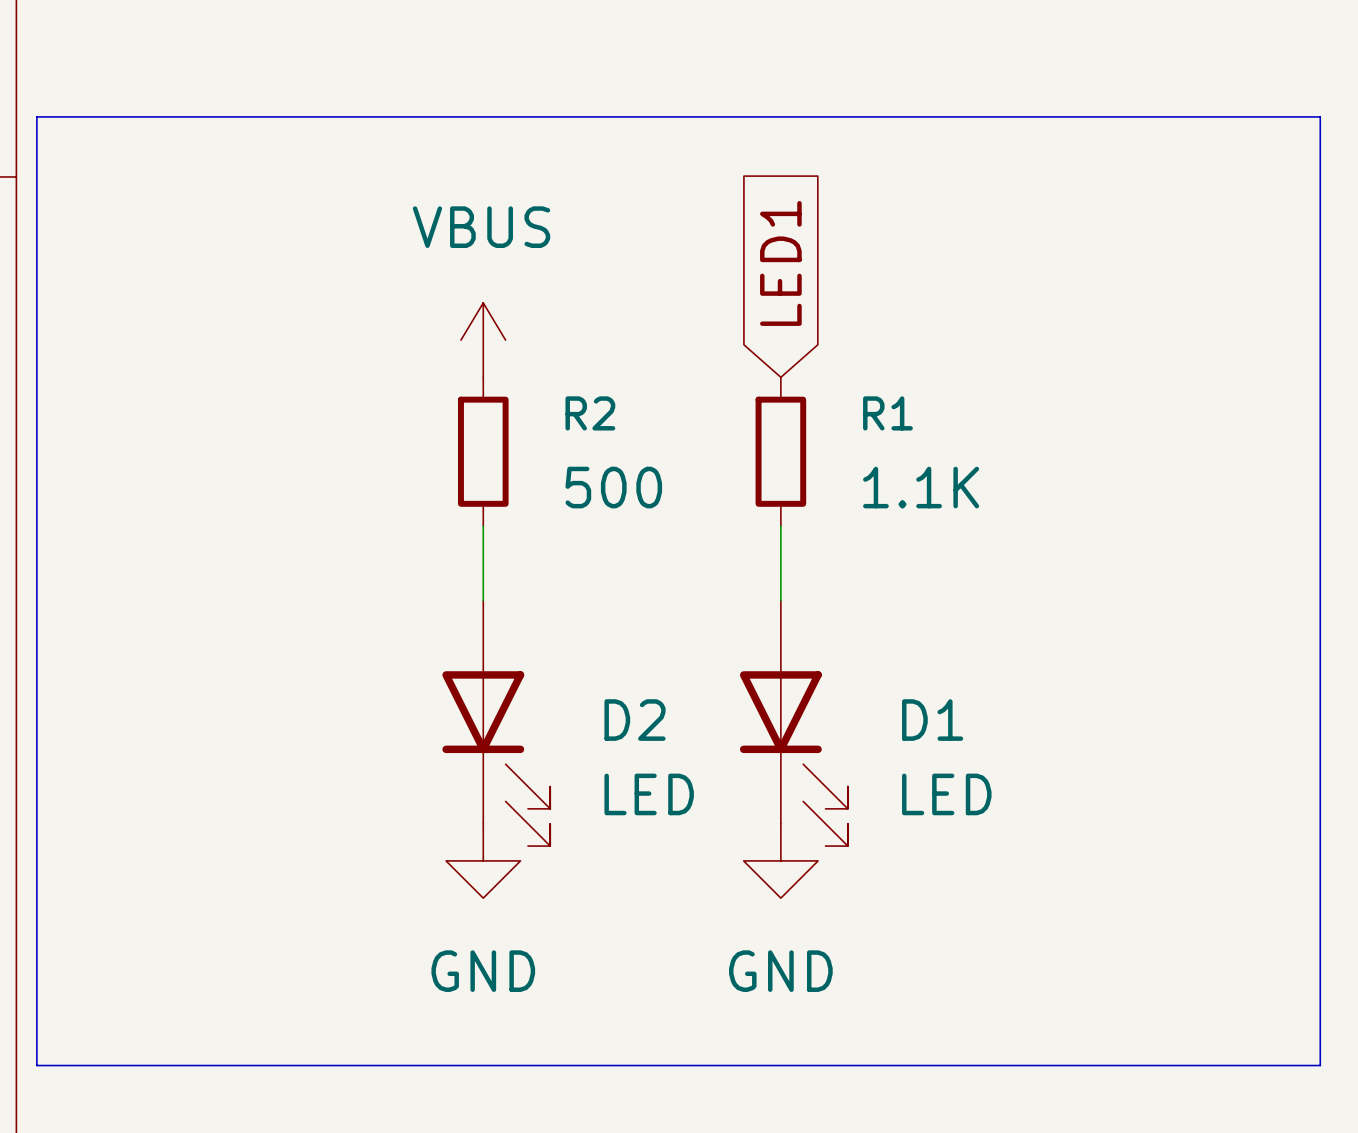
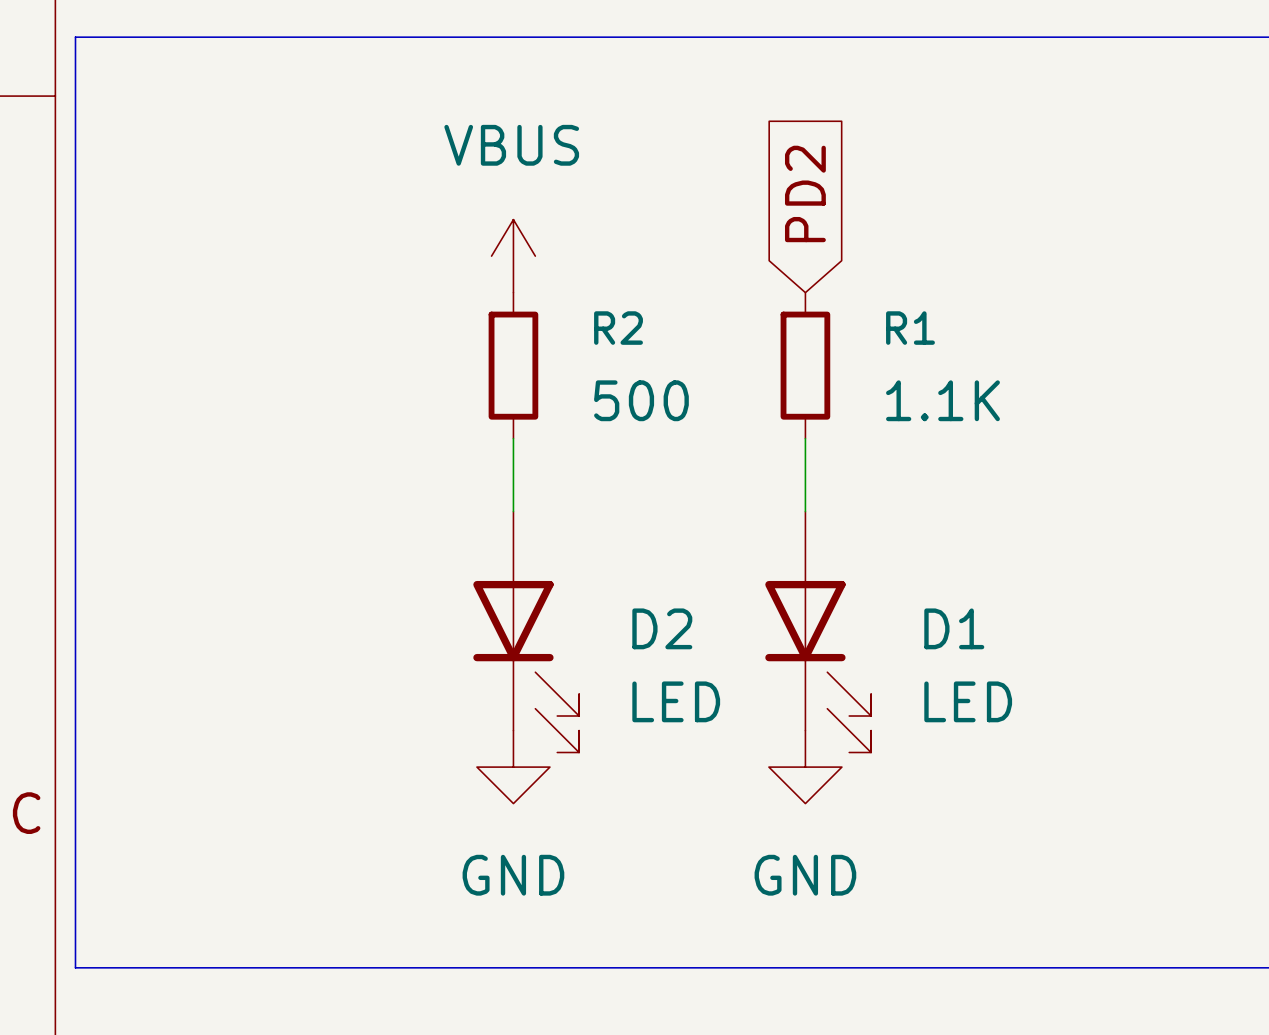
global label: LED1 (780, 263) -> PD2 (805, 193)

